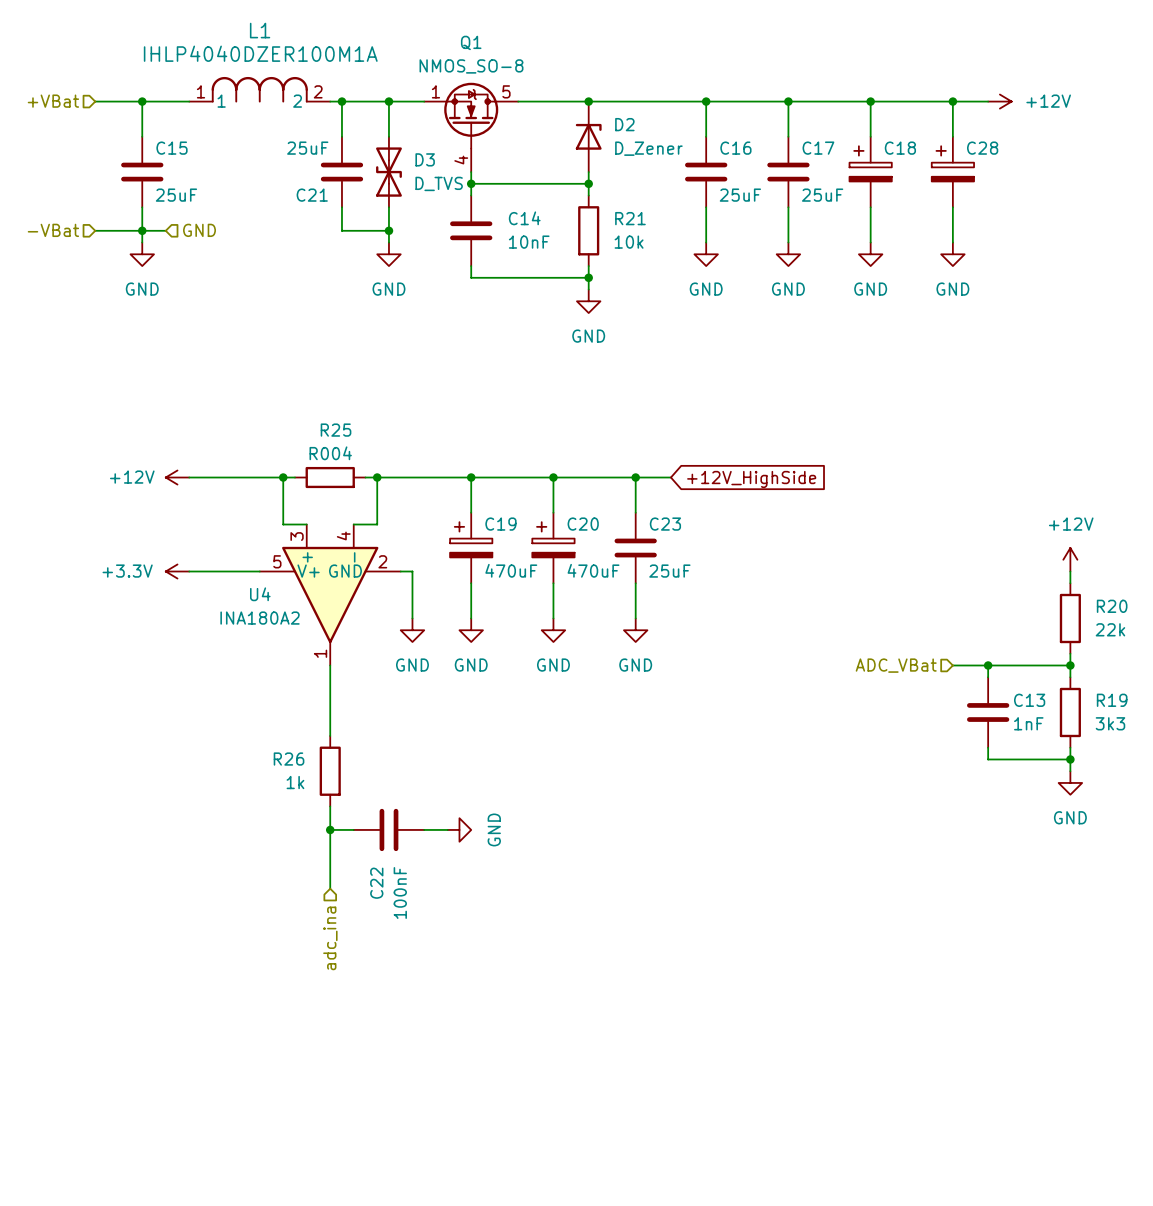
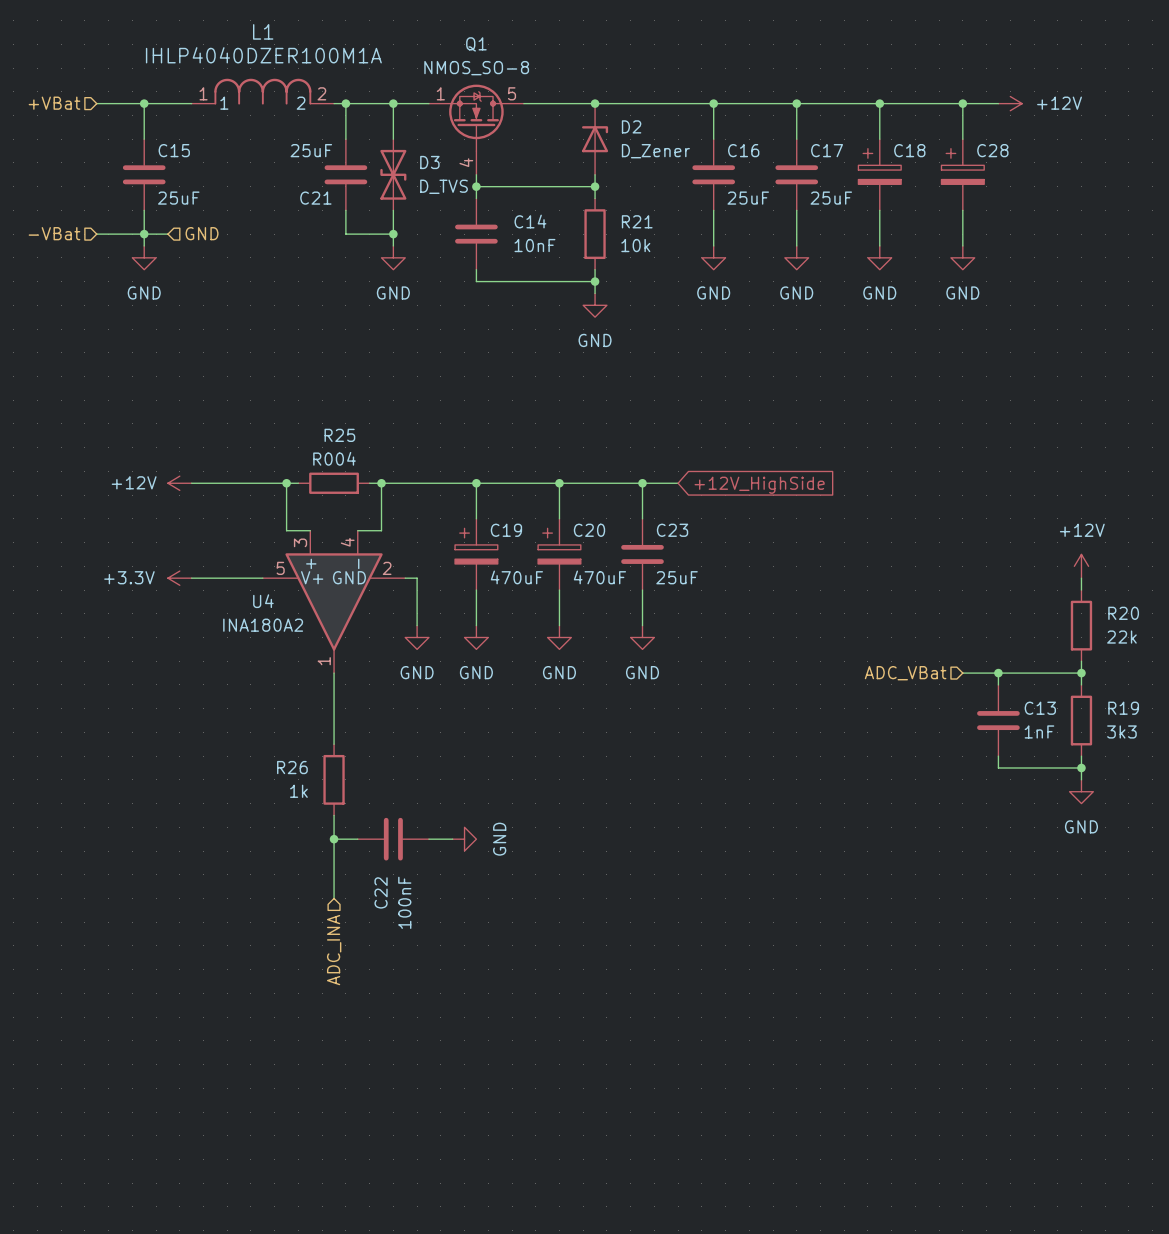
hierarchical label: adc_ina (330, 938) -> ADC_INA (334, 950)

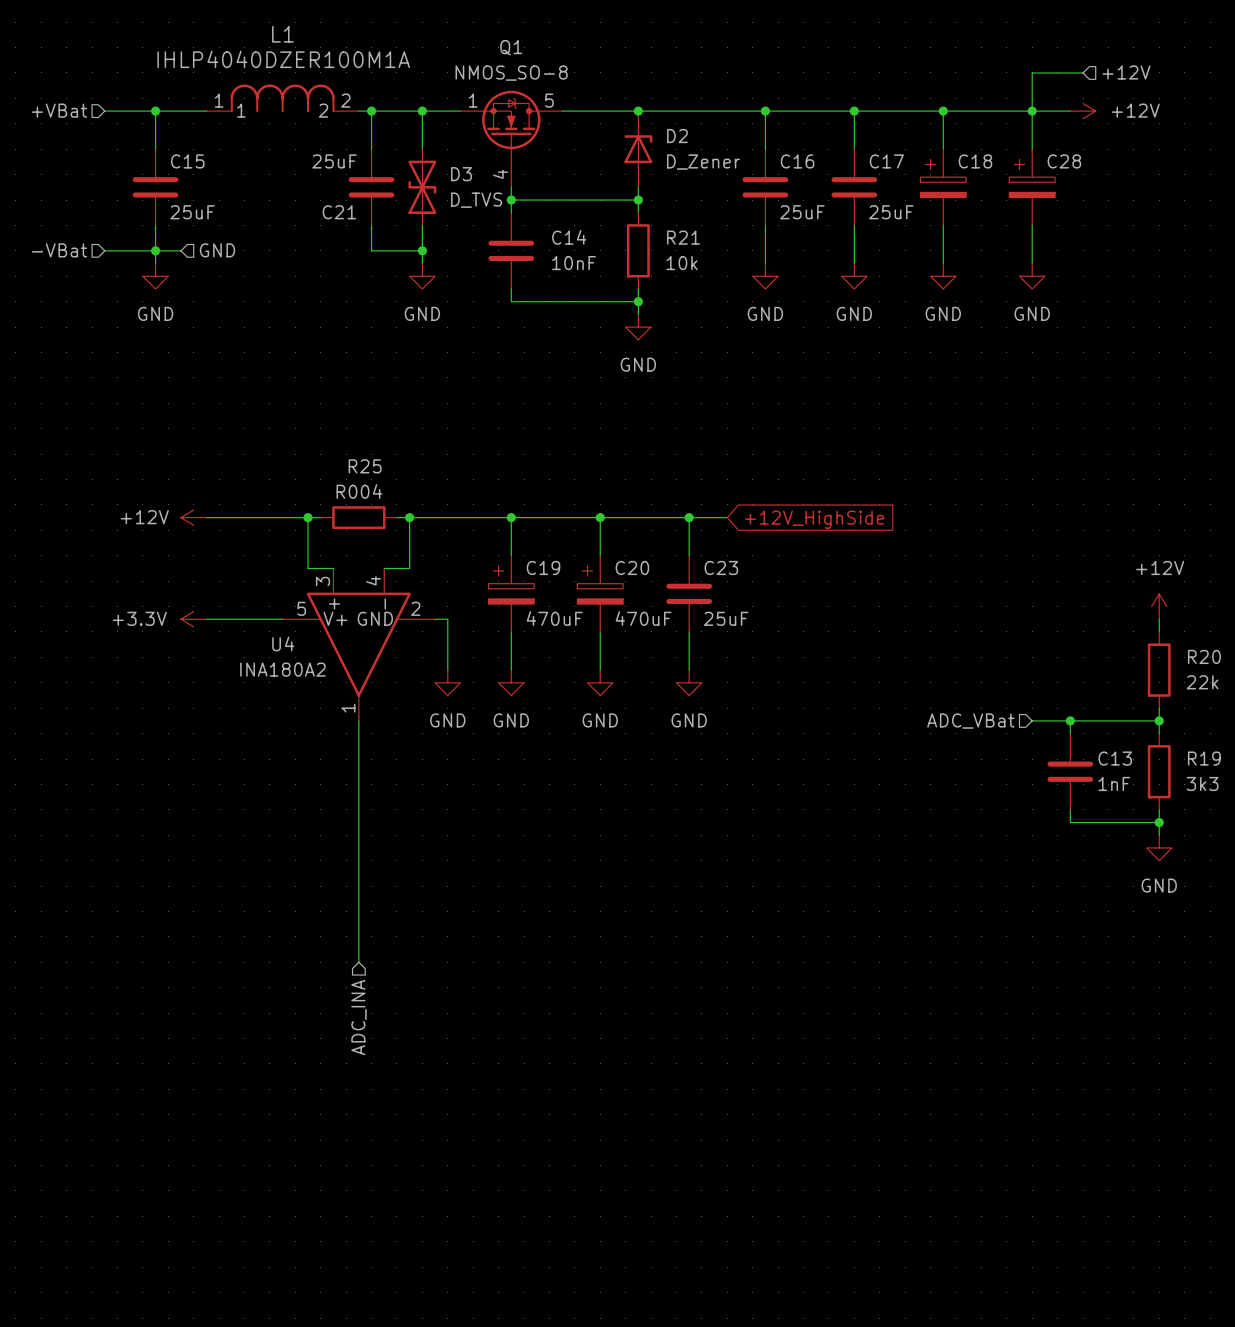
hierarchical label: none -> +12V (1126, 72)
wire: none -> (1083, 72) (1032, 72) (1032, 111)
wire: none -> (358, 797) (358, 873)
R26: 1k (334, 779) -> none
wire: (334, 839) (357, 839) -> none
junction: (334, 839) -> none
C22: 100nF (393, 839) -> none
wire: (428, 839) (452, 839) -> none
power symbol: GND (464, 839) -> none

